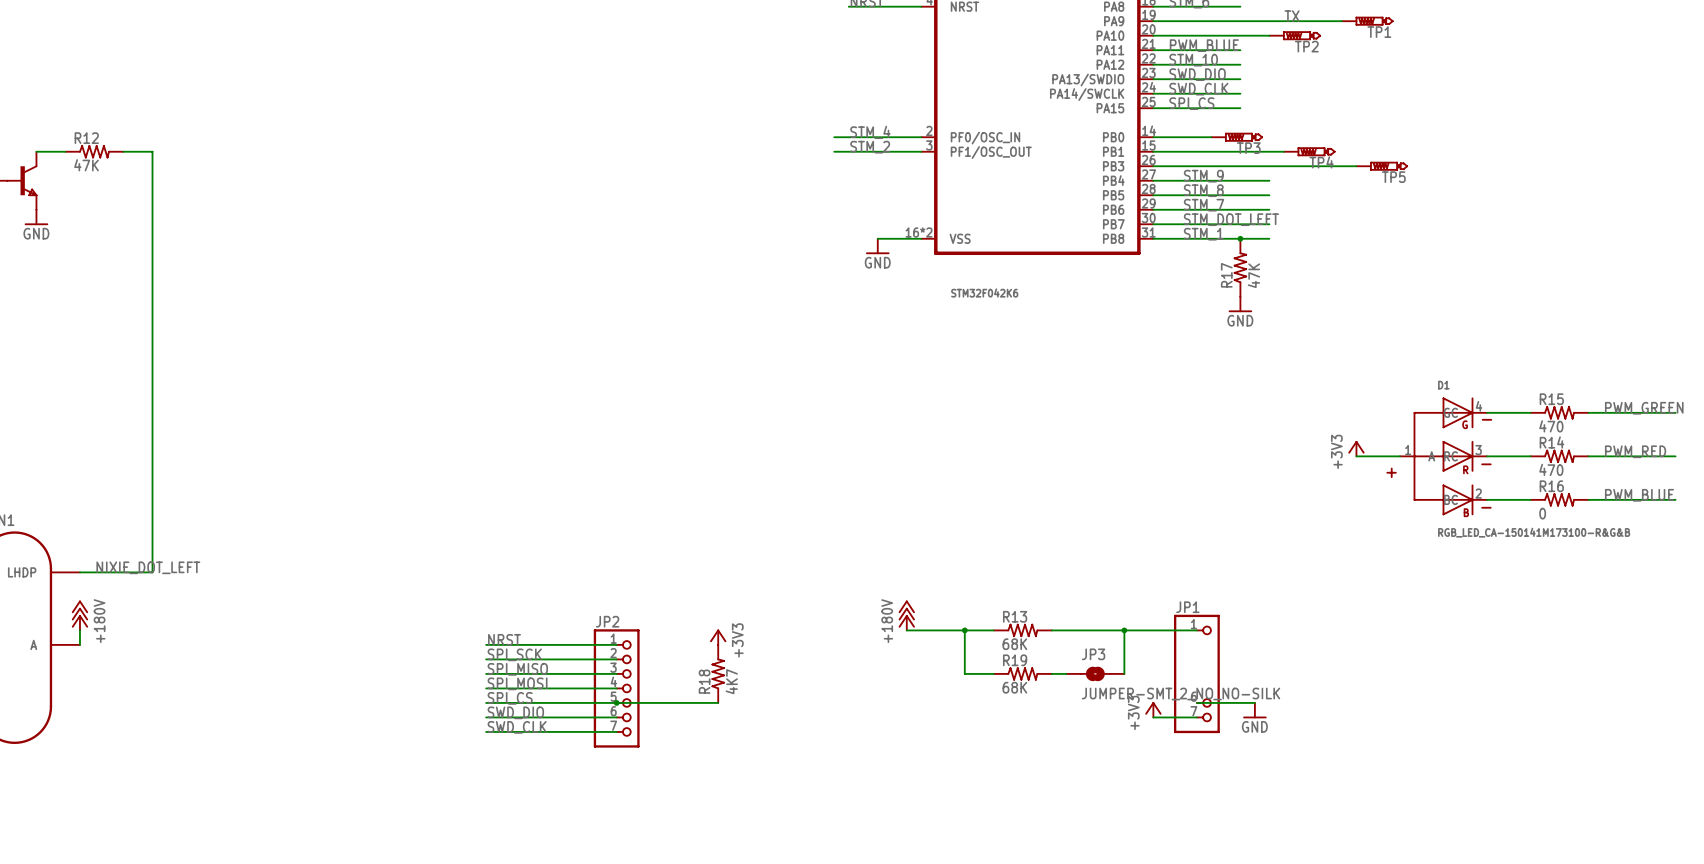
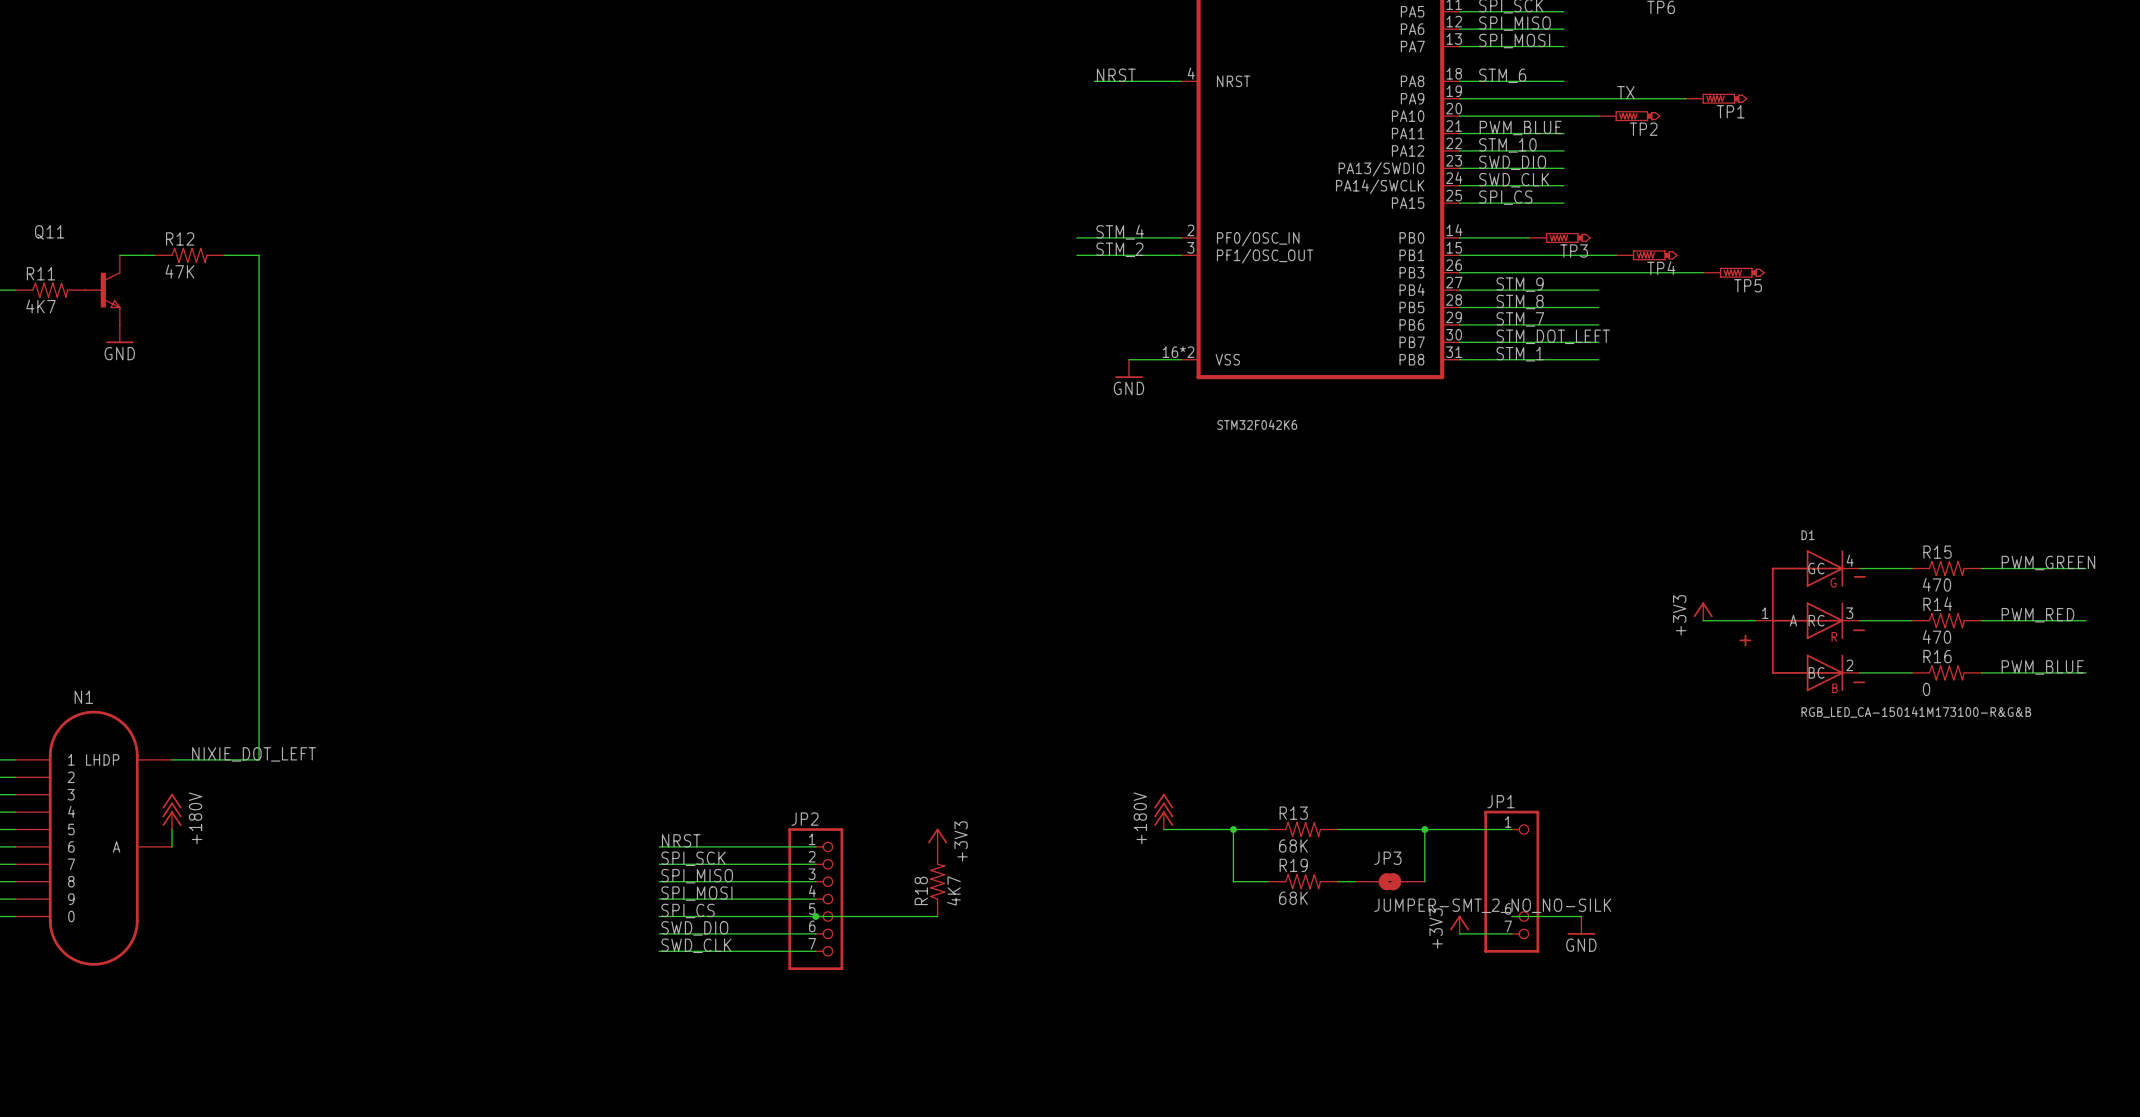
junction: (1240, 238) -> none
R17: 47K (1240, 267) -> none
power symbol: GND (1240, 304) -> none

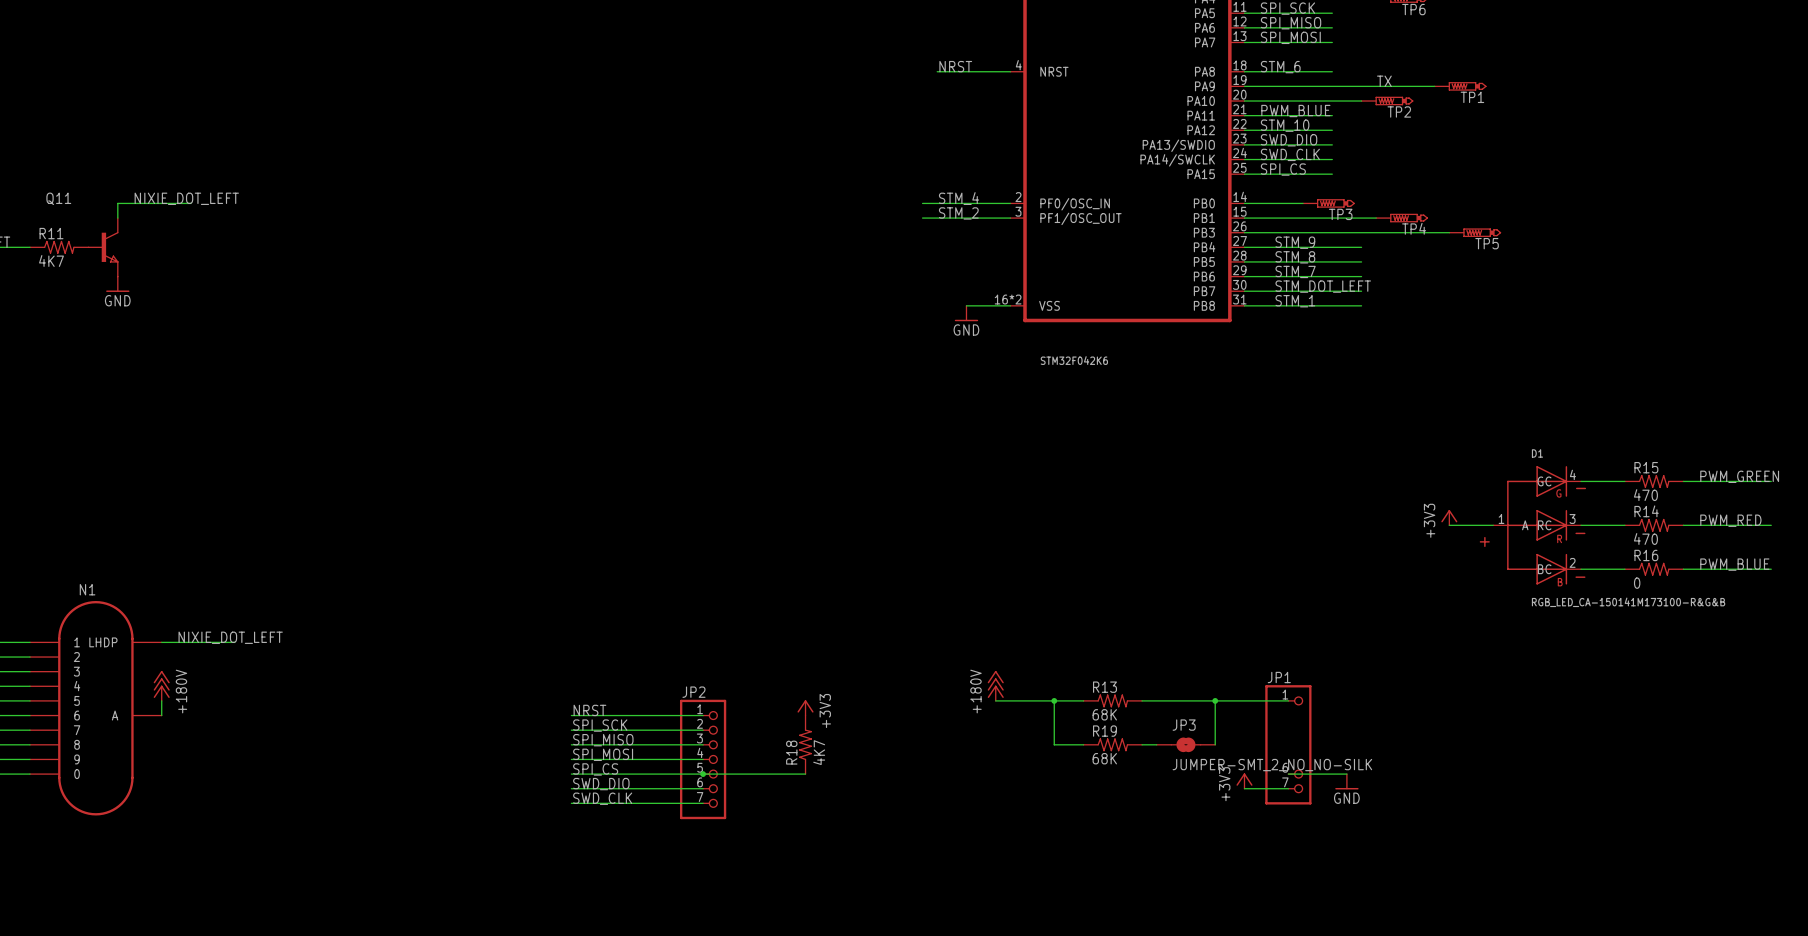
label: none -> NIXIE_DOT_LEFT (186, 198)
wire: (119, 255) (154, 255) -> (117, 218) (117, 203) (190, 203)
R12: 47K (189, 255) -> none
wire: (224, 255) (259, 255) (259, 759) -> none

